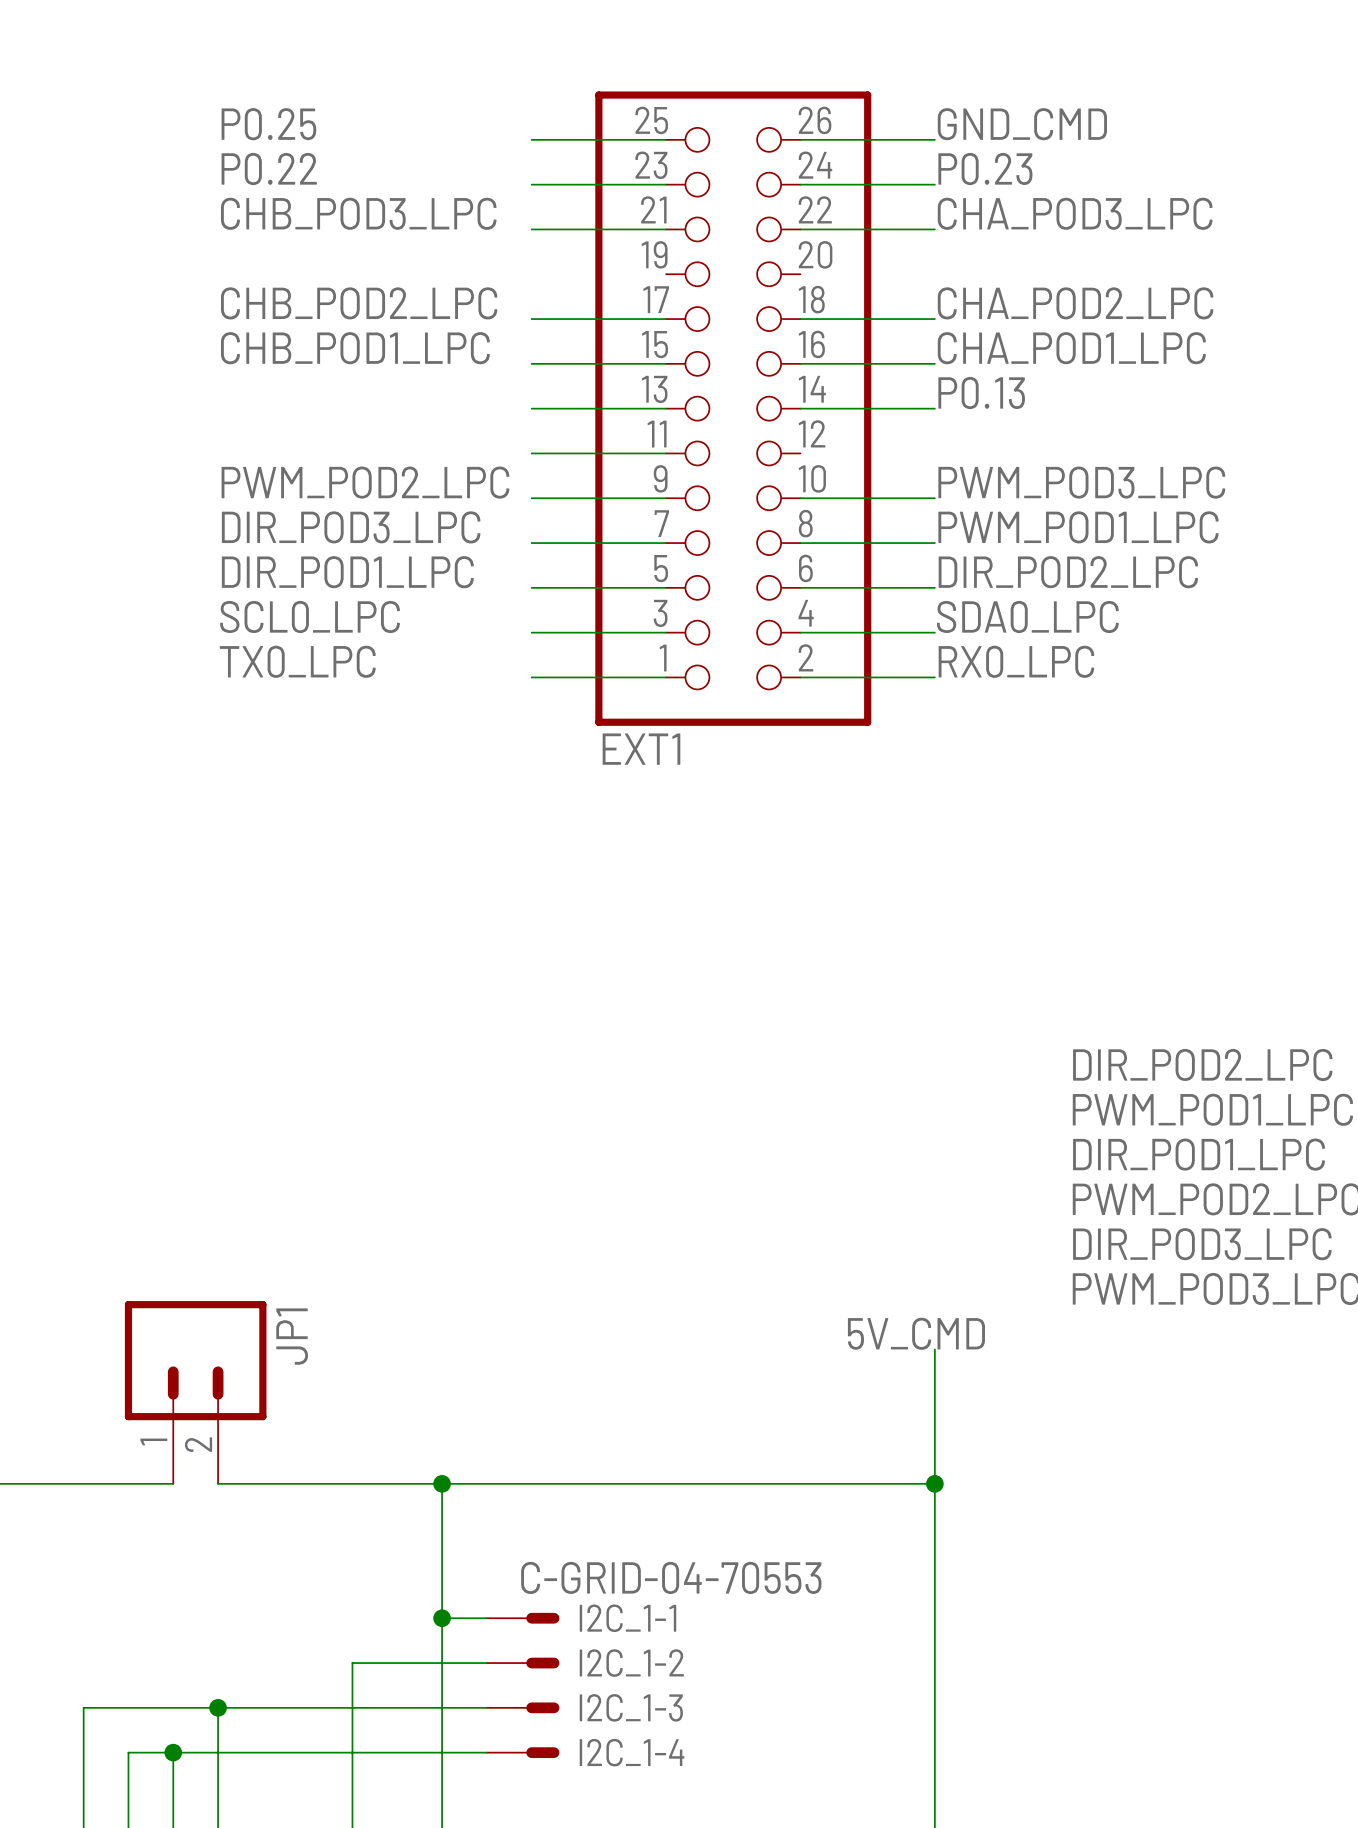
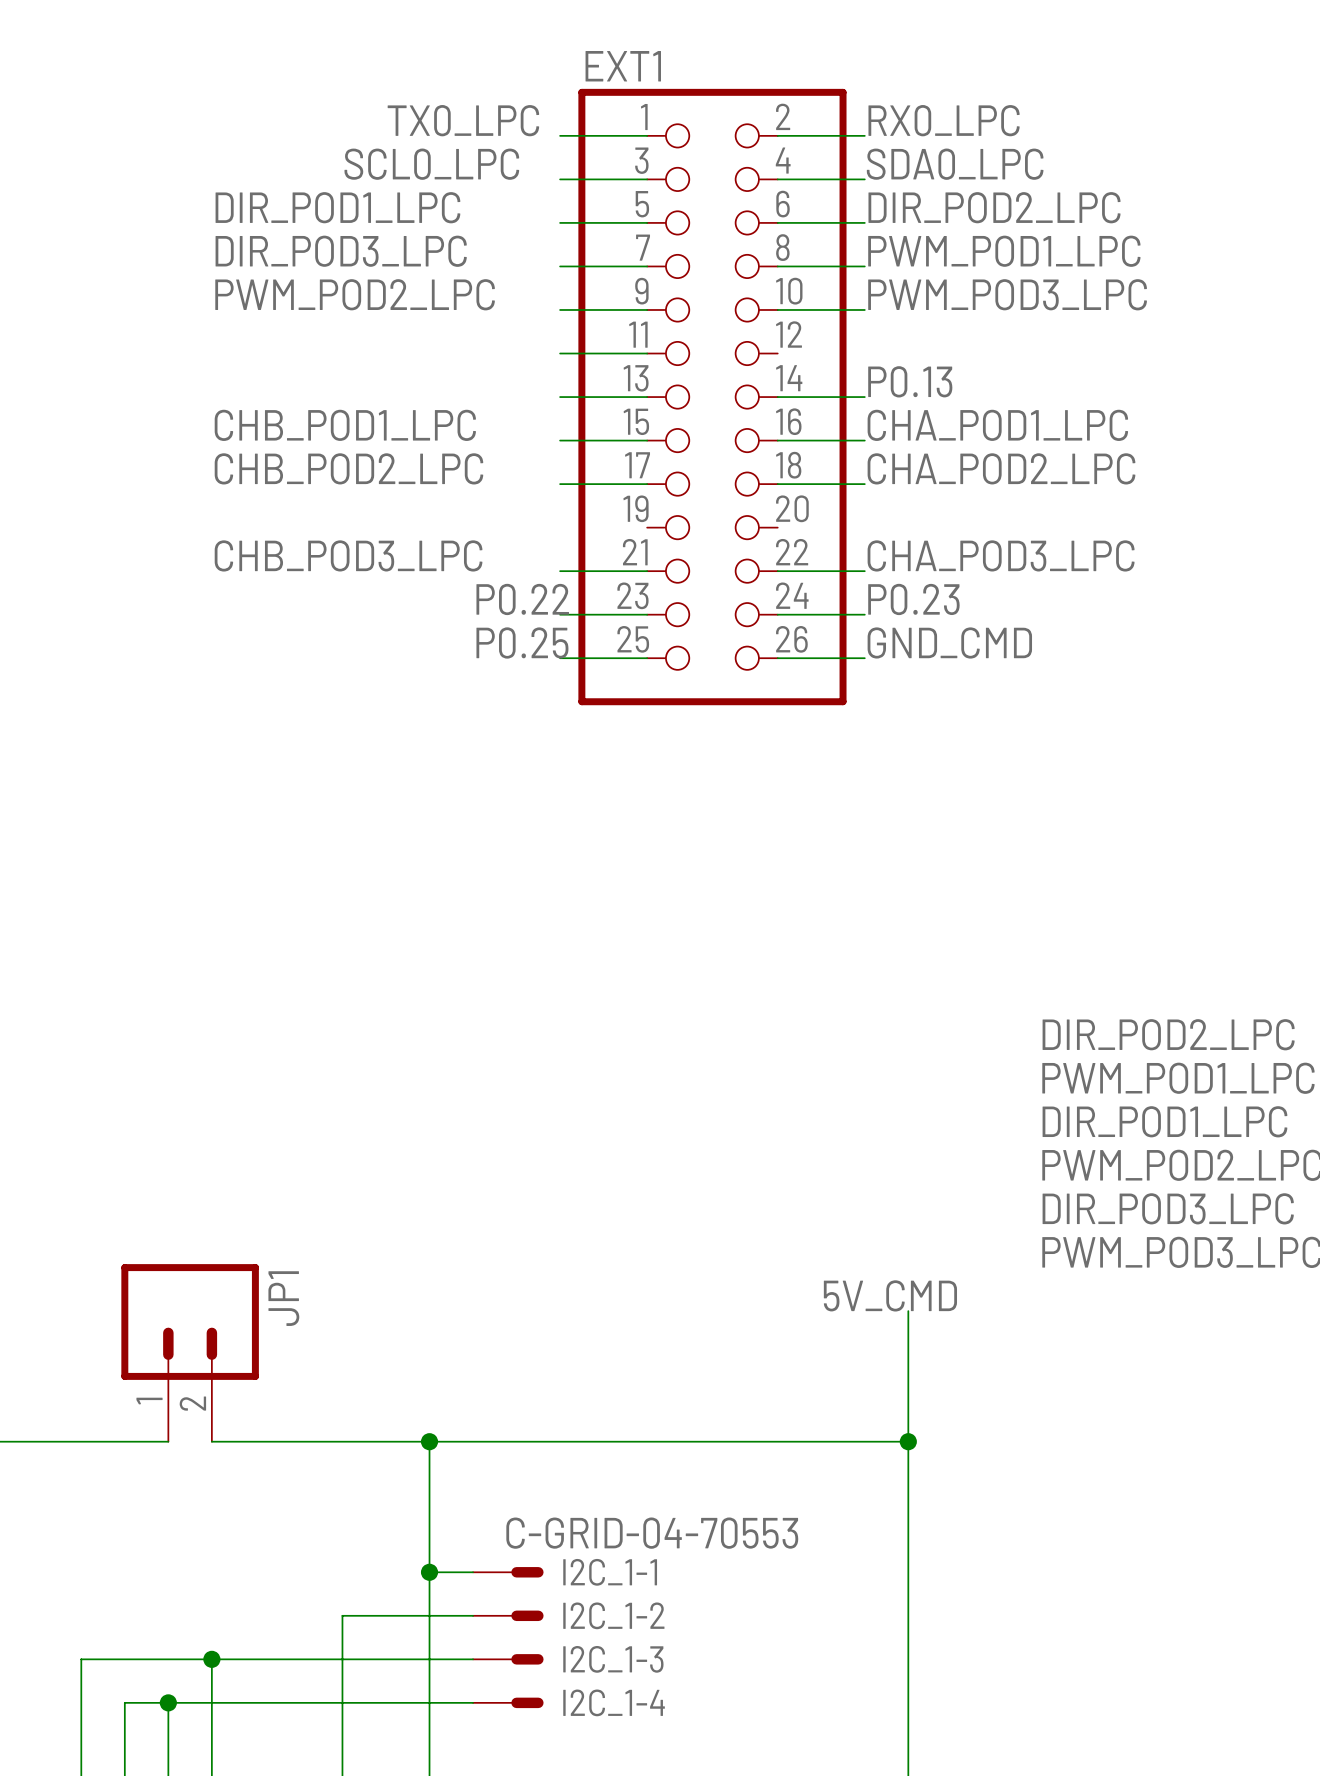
label: P0.25 (268, 124) -> none
label: none -> TX0_LPC (463, 120)
label: none -> RX0_LPC (944, 120)
label: GND_CMD (1022, 124) -> none
wire: (531, 139) (576, 139) -> none
wire: (890, 139) (934, 139) -> none
label: P0.22 (269, 168) -> none
label: none -> SCL0_LPC (431, 164)
label: none -> SDA0_LPC (955, 164)
label: P0.23 (985, 168) -> none
wire: (531, 184) (576, 184) -> none
wire: (890, 184) (934, 184) -> none
label: CHB_POD3_LPC (358, 213) -> DIR_POD1_LPC (337, 207)
label position: CHA_POD3_LPC (1075, 213) -> CHA_POD3_LPC (1001, 555)
wire: (531, 229) (576, 229) -> none
wire: (890, 229) (934, 229) -> none
wire: none -> (560, 266) (647, 266)
wire: none -> (777, 266) (864, 266)
label: CHB_POD2_LPC (359, 303) -> PWM_POD2_LPC (355, 294)
label position: CHA_POD2_LPC (1075, 303) -> CHA_POD2_LPC (1001, 468)
wire: (531, 319) (576, 319) -> none
wire: (890, 319) (934, 319) -> none
label position: CHB_POD1_LPC (355, 348) -> CHB_POD1_LPC (345, 425)
label position: CHA_POD1_LPC (1071, 348) -> CHA_POD1_LPC (997, 425)
wire: (531, 363) (576, 363) -> none
wire: (800, 363) (934, 363) -> none
label position: P0.13 (981, 392) -> P0.13 (910, 381)
wire: (531, 408) (576, 408) -> none
EXT1 flip: as is (733, 408) -> up-down (712, 397)
wire: (890, 408) (934, 408) -> none
wire: (531, 453) (576, 453) -> none
wire: none -> (777, 440) (864, 440)
label: PWM_POD2_LPC (365, 482) -> CHB_POD2_LPC (348, 468)
label position: PWM_POD3_LPC (1081, 482) -> PWM_POD3_LPC (1007, 294)
wire: (531, 498) (576, 498) -> none
wire: (890, 498) (934, 498) -> none
label position: DIR_POD3_LPC (351, 527) -> DIR_POD3_LPC (341, 251)
label position: PWM_POD1_LPC (1078, 527) -> PWM_POD1_LPC (1004, 251)
wire: (531, 543) (666, 543) -> none
wire: (800, 543) (934, 543) -> none
label: DIR_POD1_LPC (347, 572) -> CHB_POD3_LPC (348, 555)
label position: DIR_POD2_LPC (1068, 572) -> DIR_POD2_LPC (994, 207)
wire: (531, 587) (576, 587) -> none
wire: (890, 587) (934, 587) -> none
label: SCL0_LPC (310, 616) -> none
label: none -> P0.22 (522, 599)
label: none -> P0.23 (913, 599)
label: SDA0_LPC (1027, 616) -> none
wire: (531, 632) (576, 632) -> none
wire: (890, 632) (934, 632) -> none
label: TX0_LPC (297, 661) -> none
label: none -> P0.25 (522, 642)
label: none -> GND_CMD (949, 643)
label: RX0_LPC (1016, 661) -> none
wire: (531, 677) (576, 677) -> none
wire: (890, 677) (934, 677) -> none

